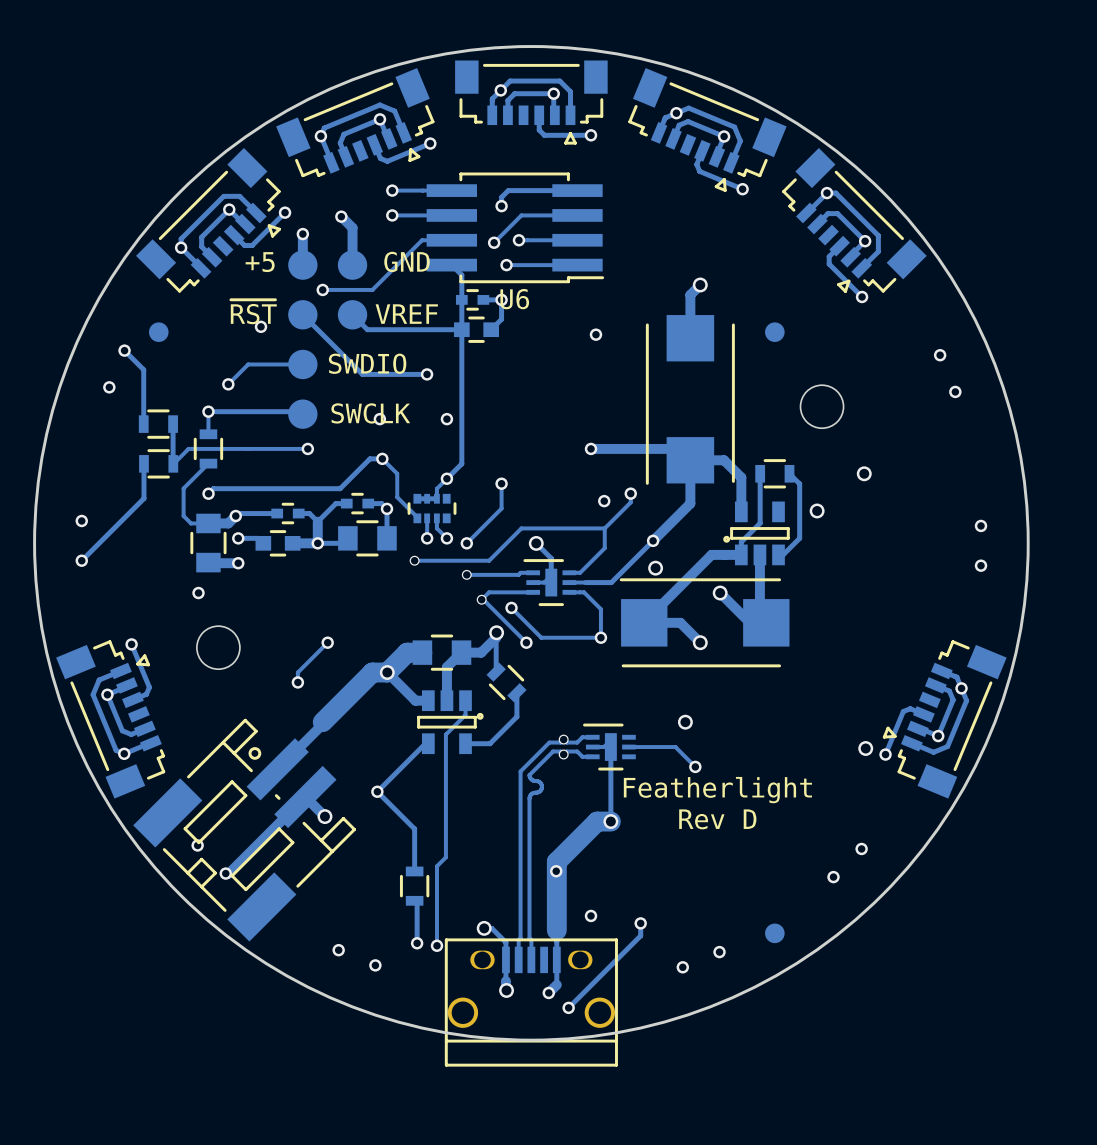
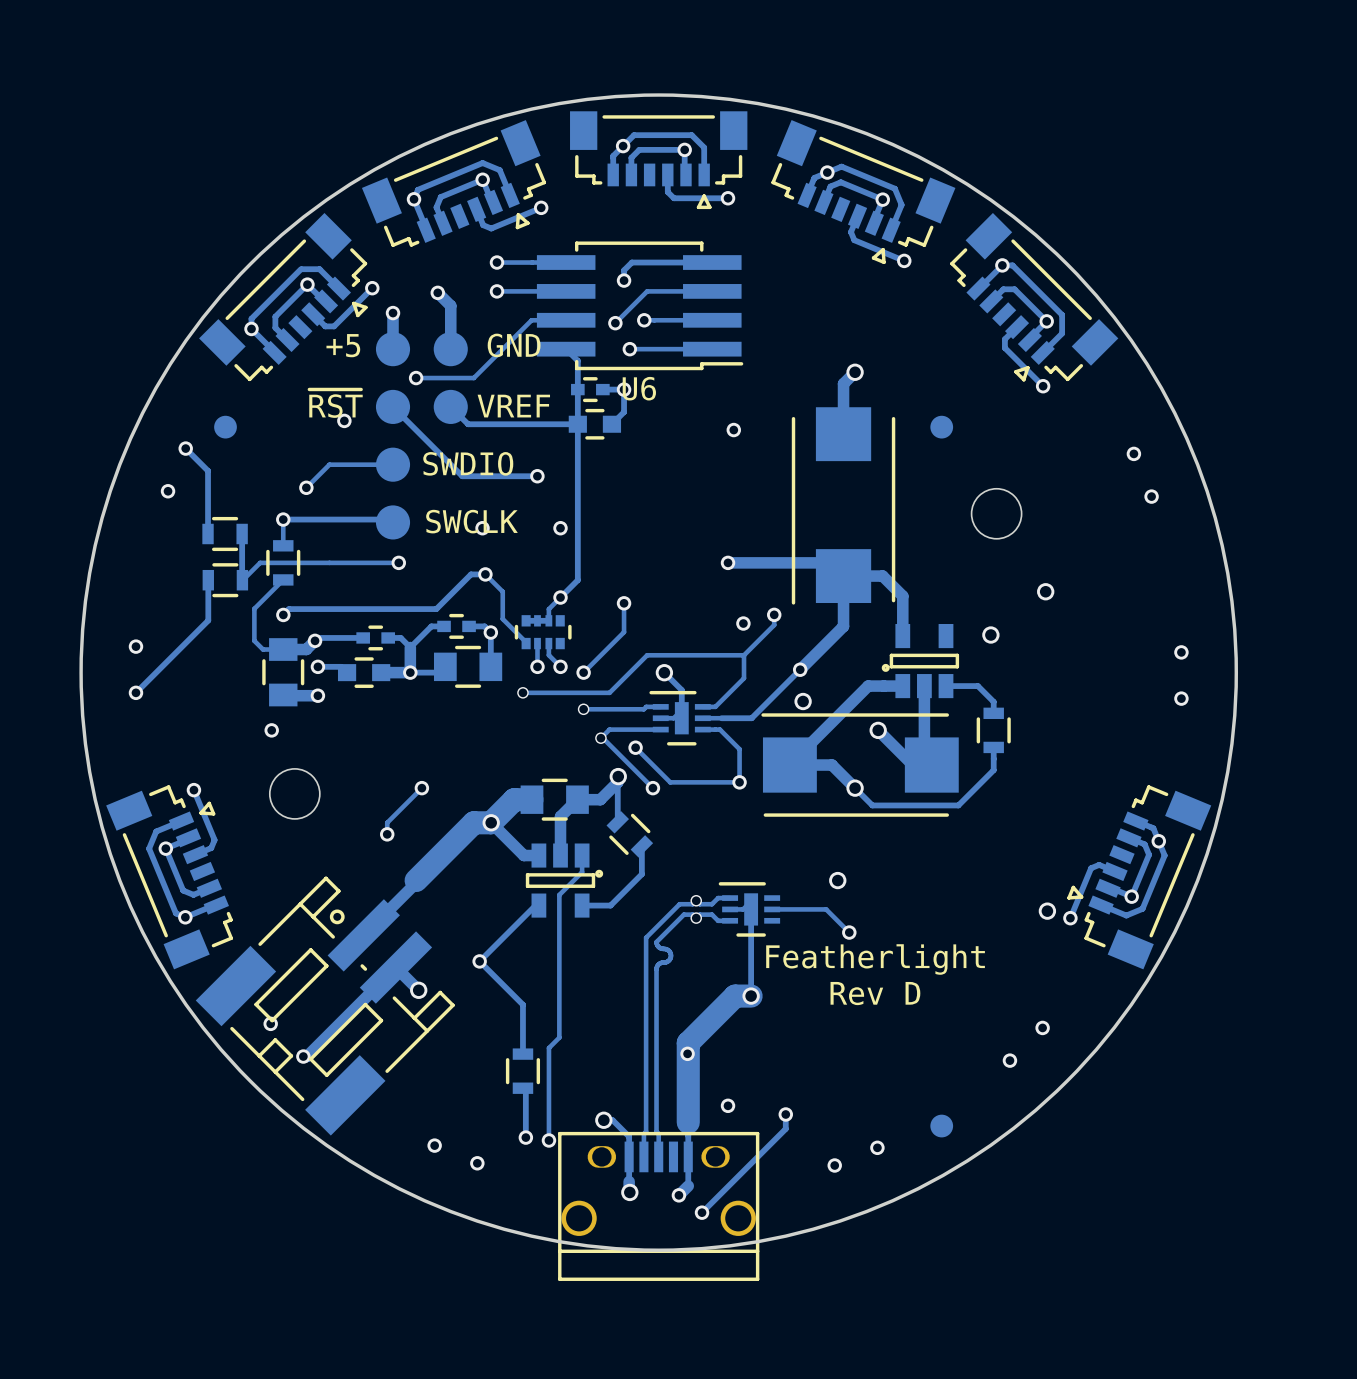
track: (760, 473) (760, 523) (741, 542) (741, 554) -> none
part rotation: 0° (774, 473) -> 90° clockwise (993, 730)
part position: (774, 473) -> (993, 730)
track: (789, 473) (799, 483) (799, 538) (783, 554) -> (993, 713) (993, 701) (977, 686) (951, 686)
track: none -> (993, 747) (993, 770) (958, 805) (872, 805) (855, 788)

